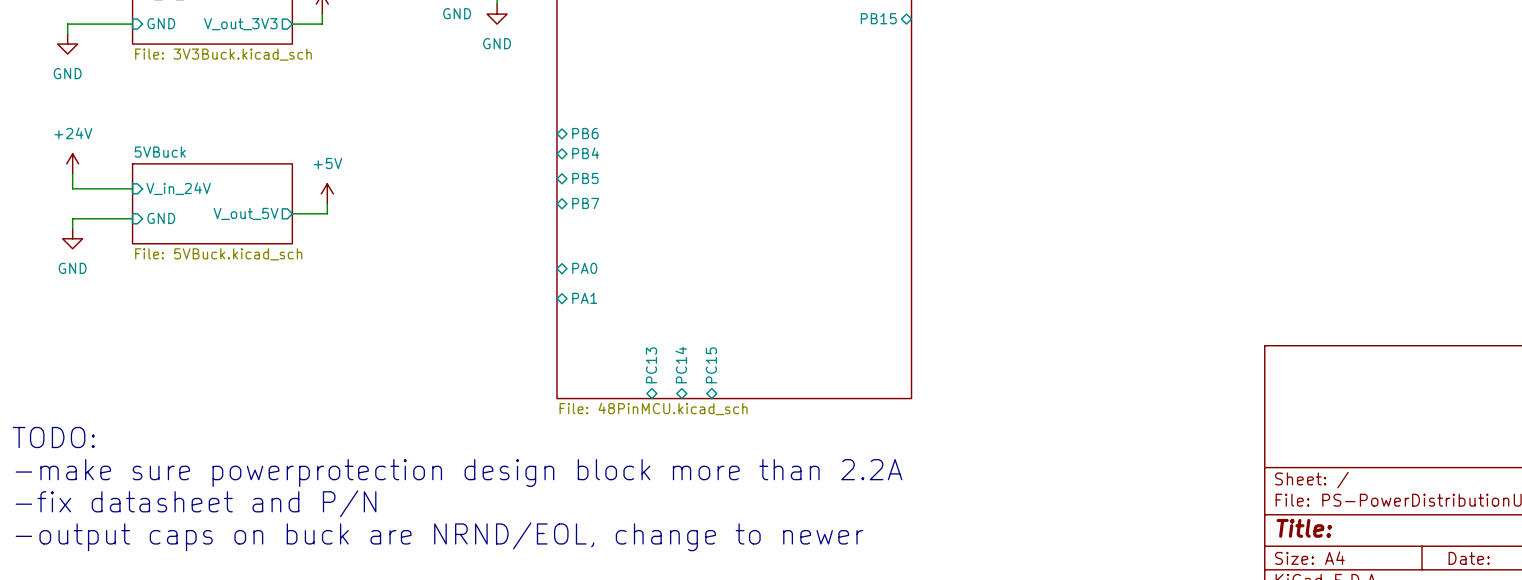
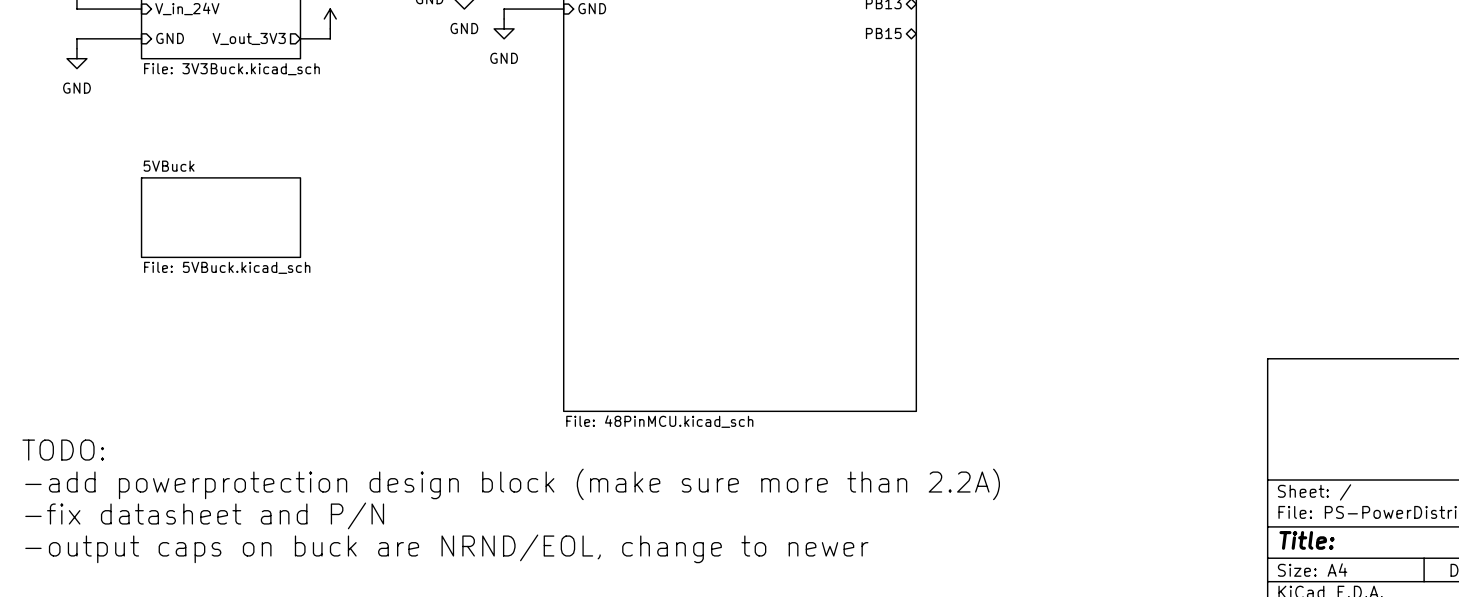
sheet pin: PB6 (585, 133) -> none
sheet pin: PB4 (585, 153) -> none
power symbol: +24V (72, 163) -> none
wire: (72, 173) (72, 188) (132, 188) -> none
sheet pin: PB5 (585, 178) -> none
sheet pin: V_in_24V (178, 188) -> none
power symbol: +5V (327, 193) -> none
wire: (327, 203) (327, 213) (292, 213) -> none
sheet pin: PB7 (585, 203) -> none
sheet pin: V_out_5V (246, 213) -> none
wire: (132, 218) (72, 218) (72, 228) -> none
sheet pin: GND (161, 218) -> none
power symbol: GND (72, 238) -> none
sheet pin: PA0 (584, 268) -> none
sheet pin: PA1 (584, 298) -> none
sheet pin: PC13 (651, 365) -> none
sheet pin: PC14 (681, 365) -> none
sheet pin: PC15 (711, 365) -> none
text: -make sure powerprotection design block more than 2.2A (459, 472) -> -add powerprotection design block (make sure more than 2.2A) (512, 484)

